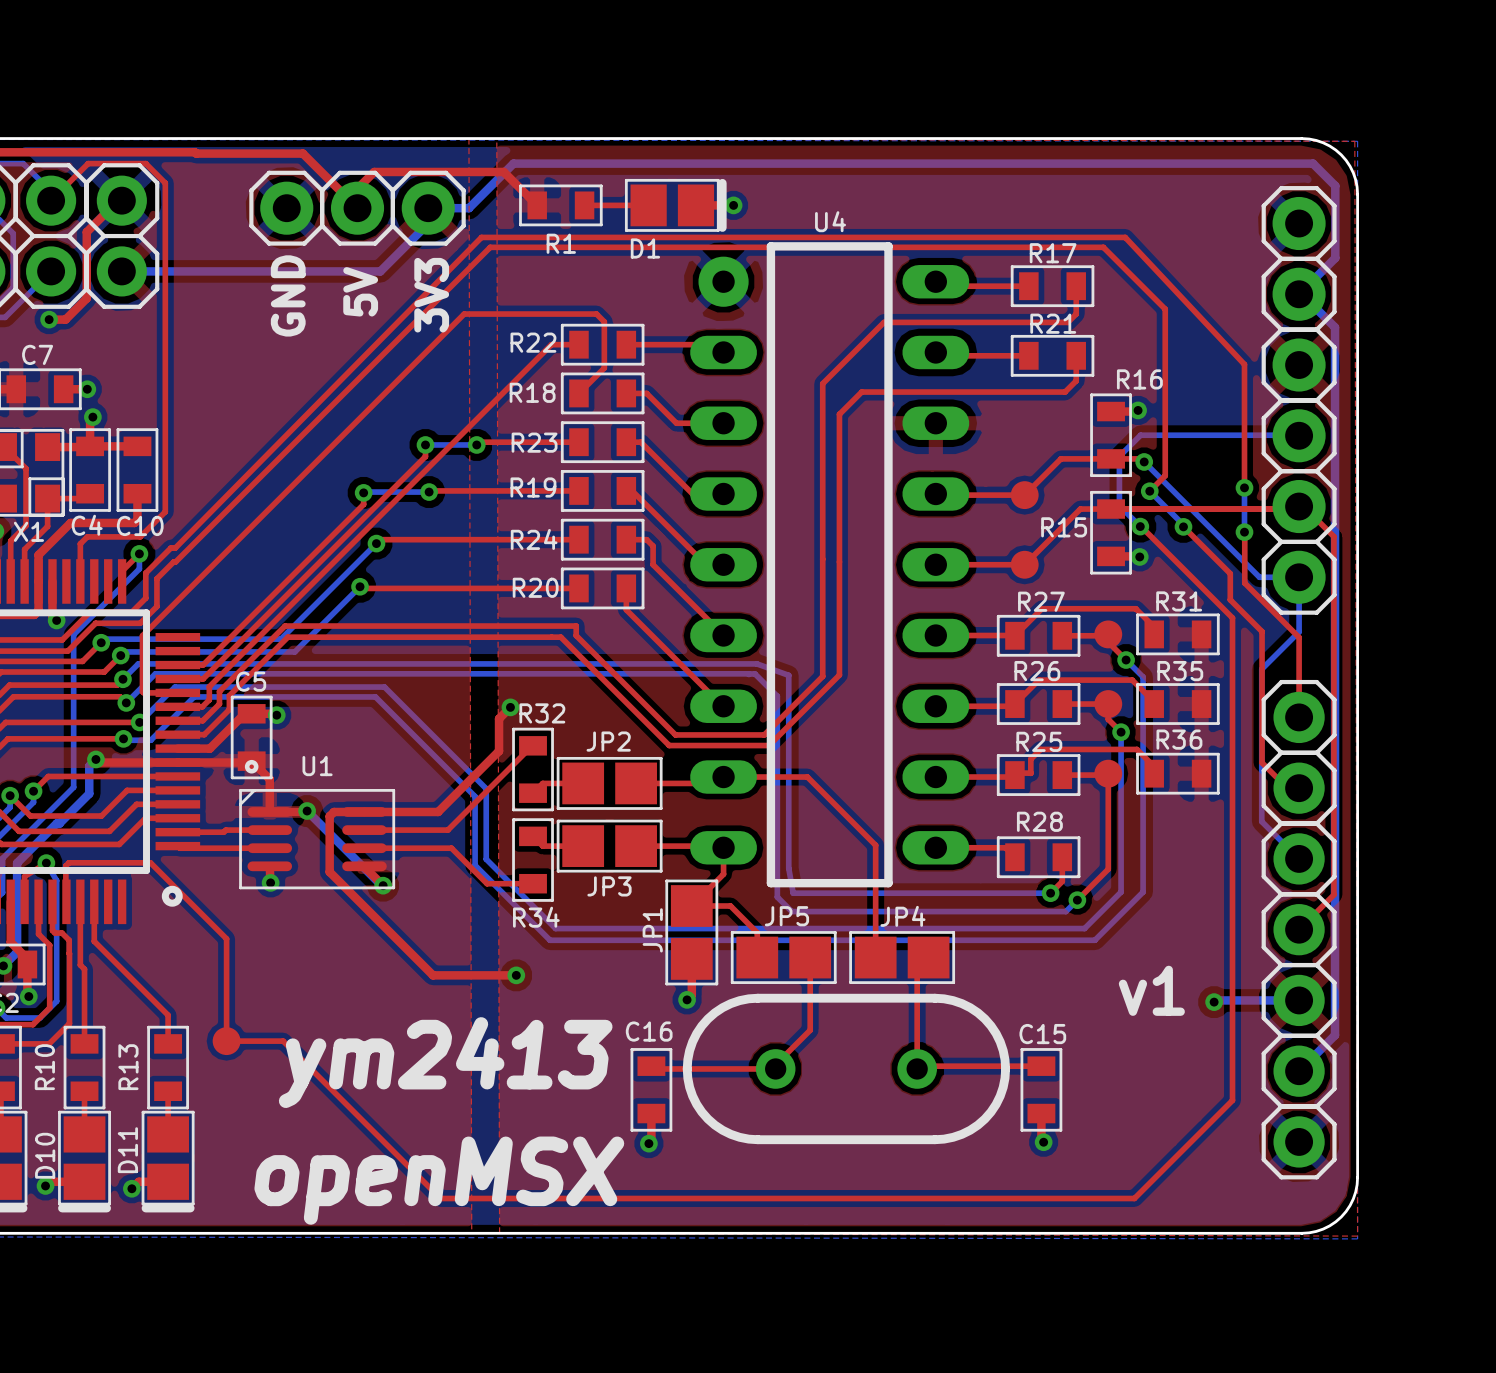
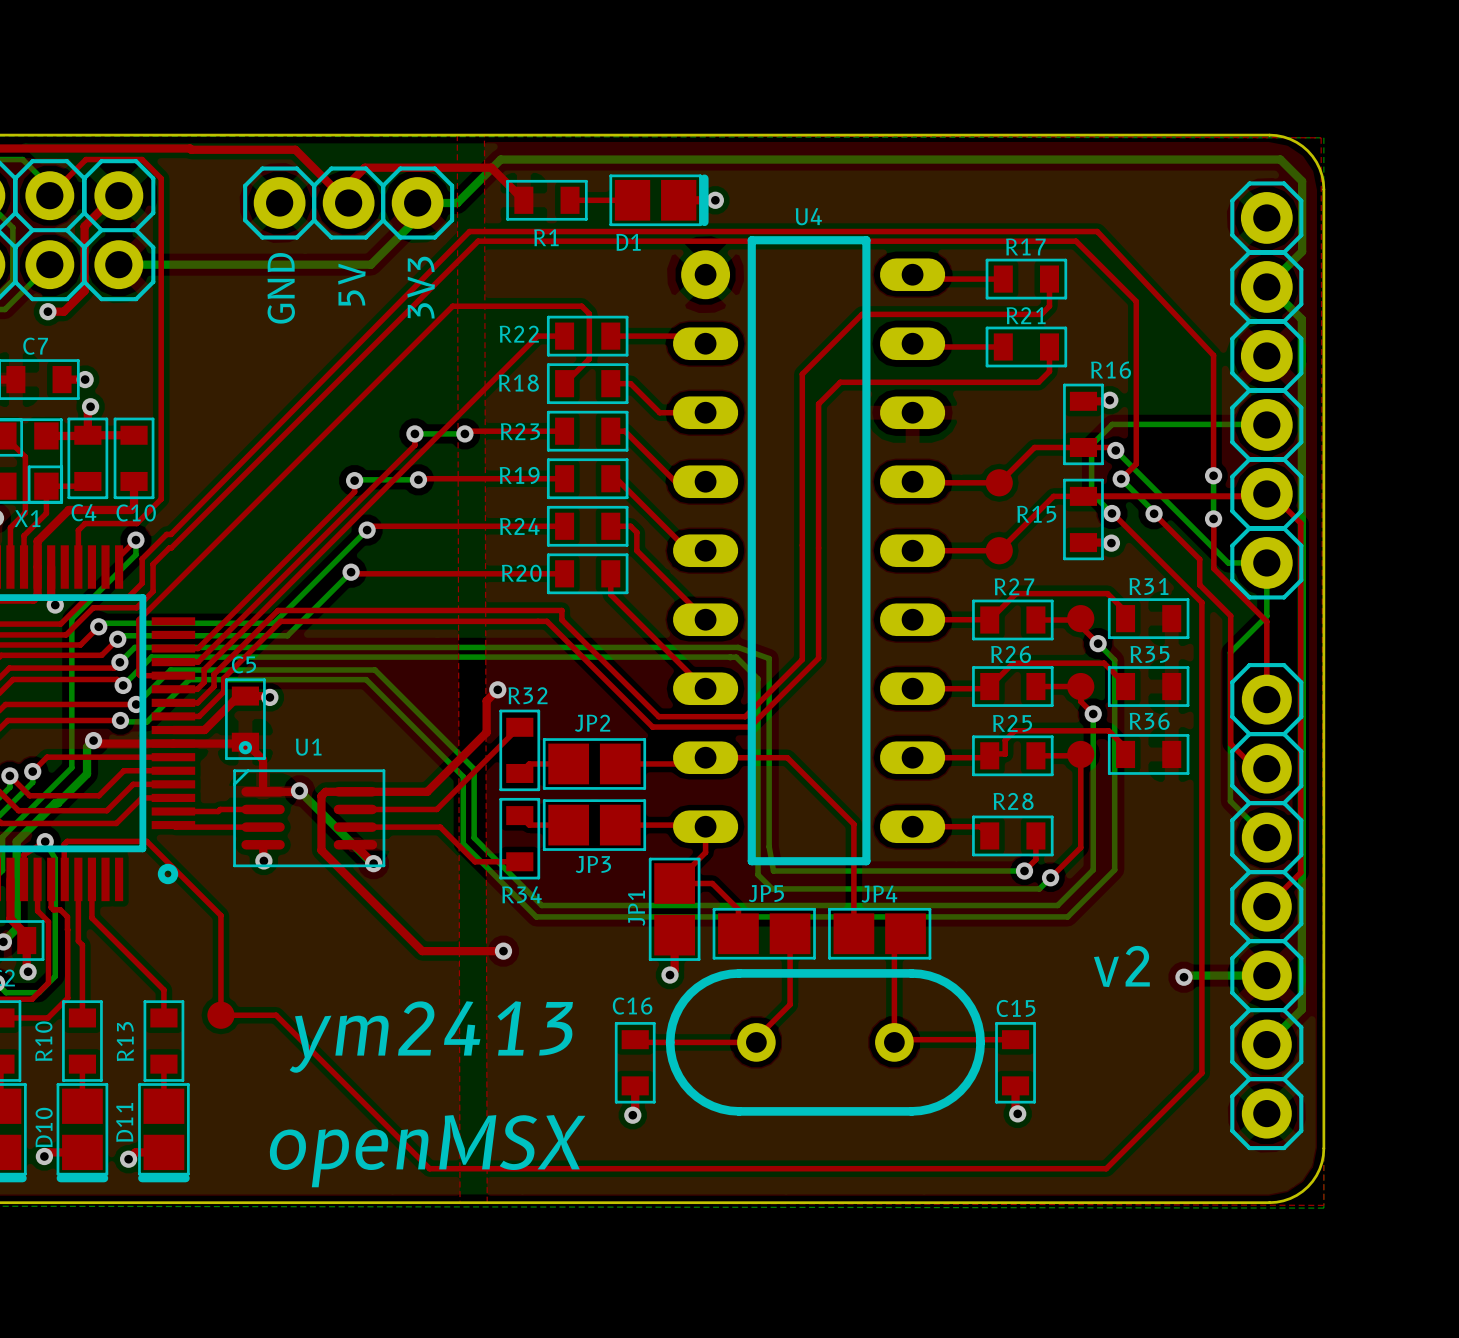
text: v1 (1151, 990) -> v2 (1121, 966)

